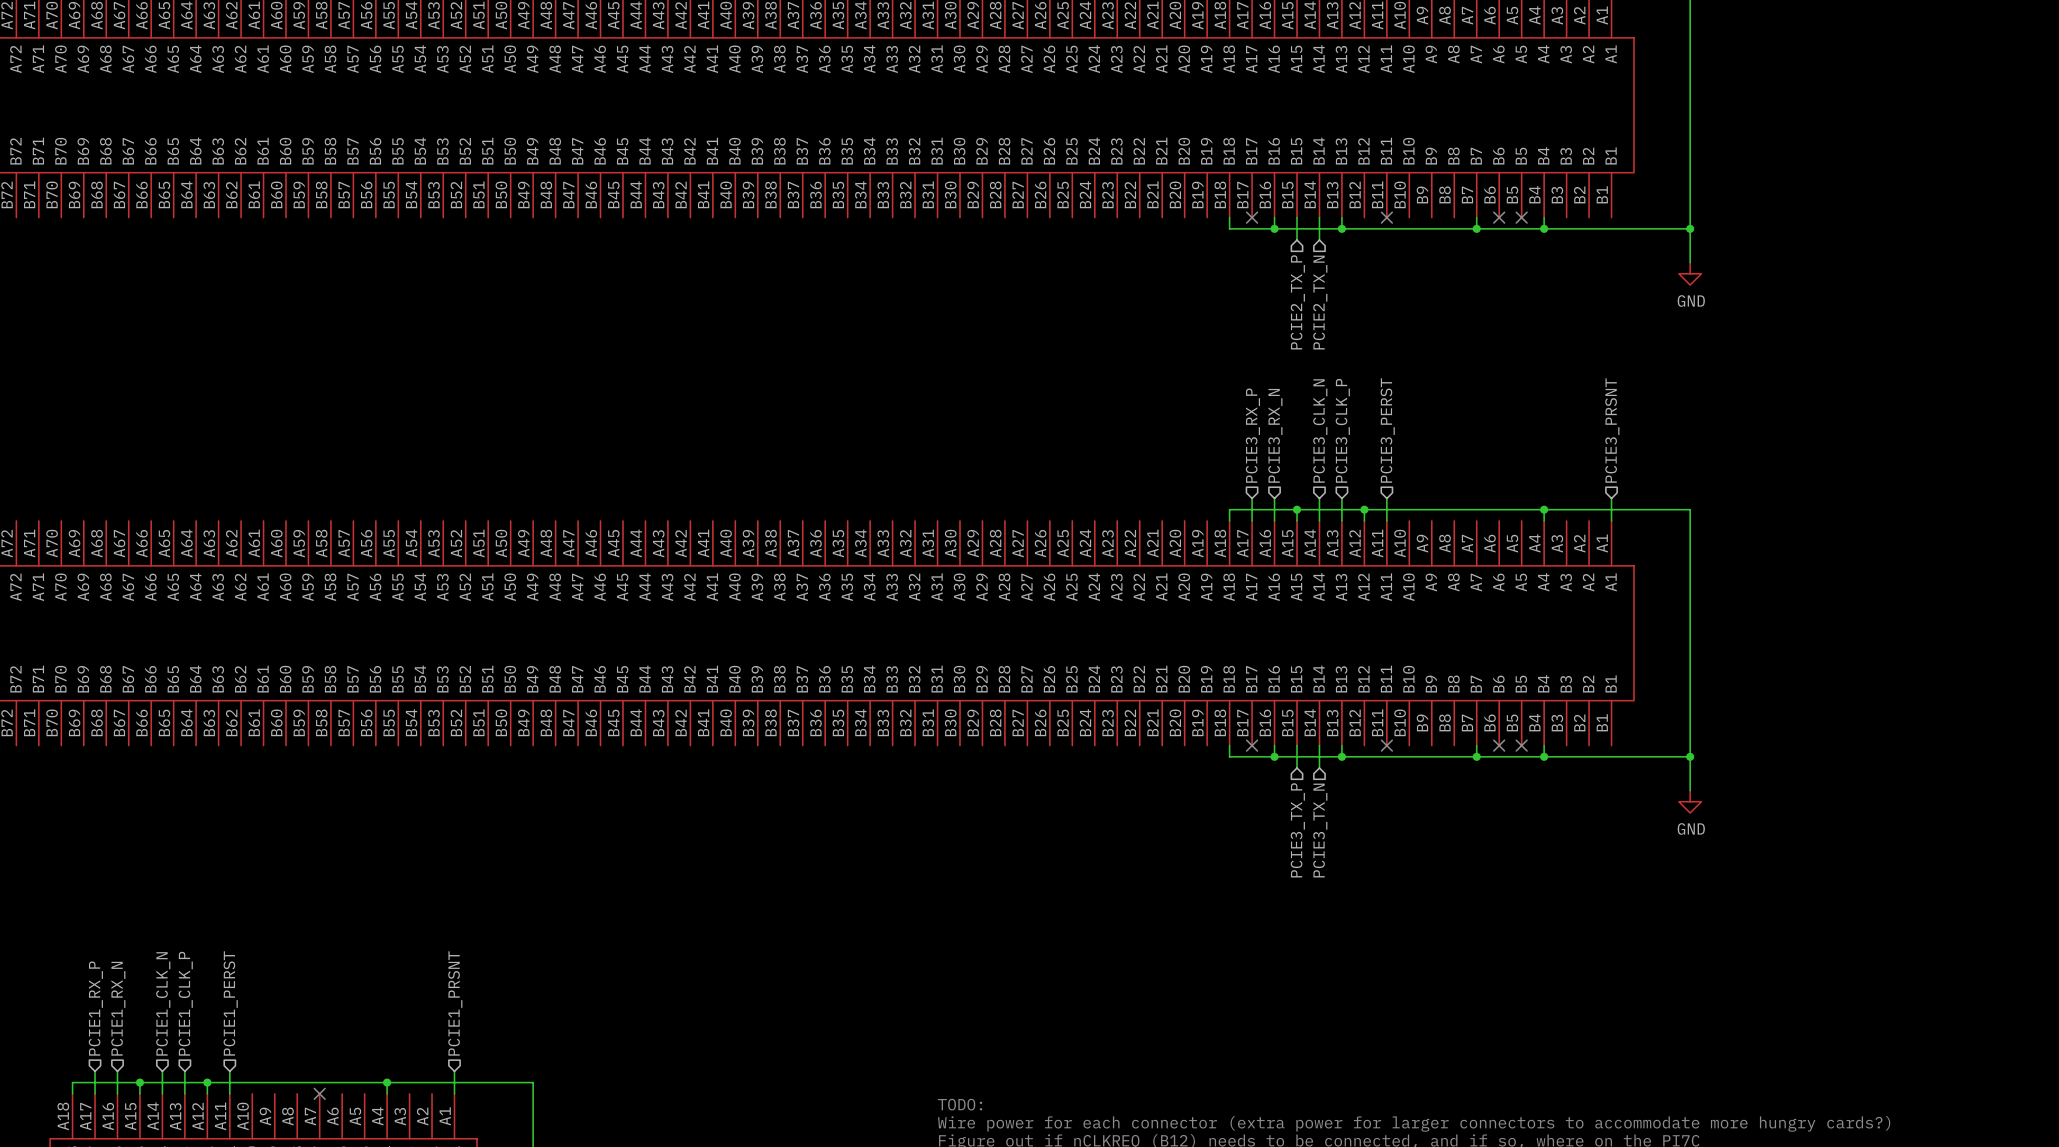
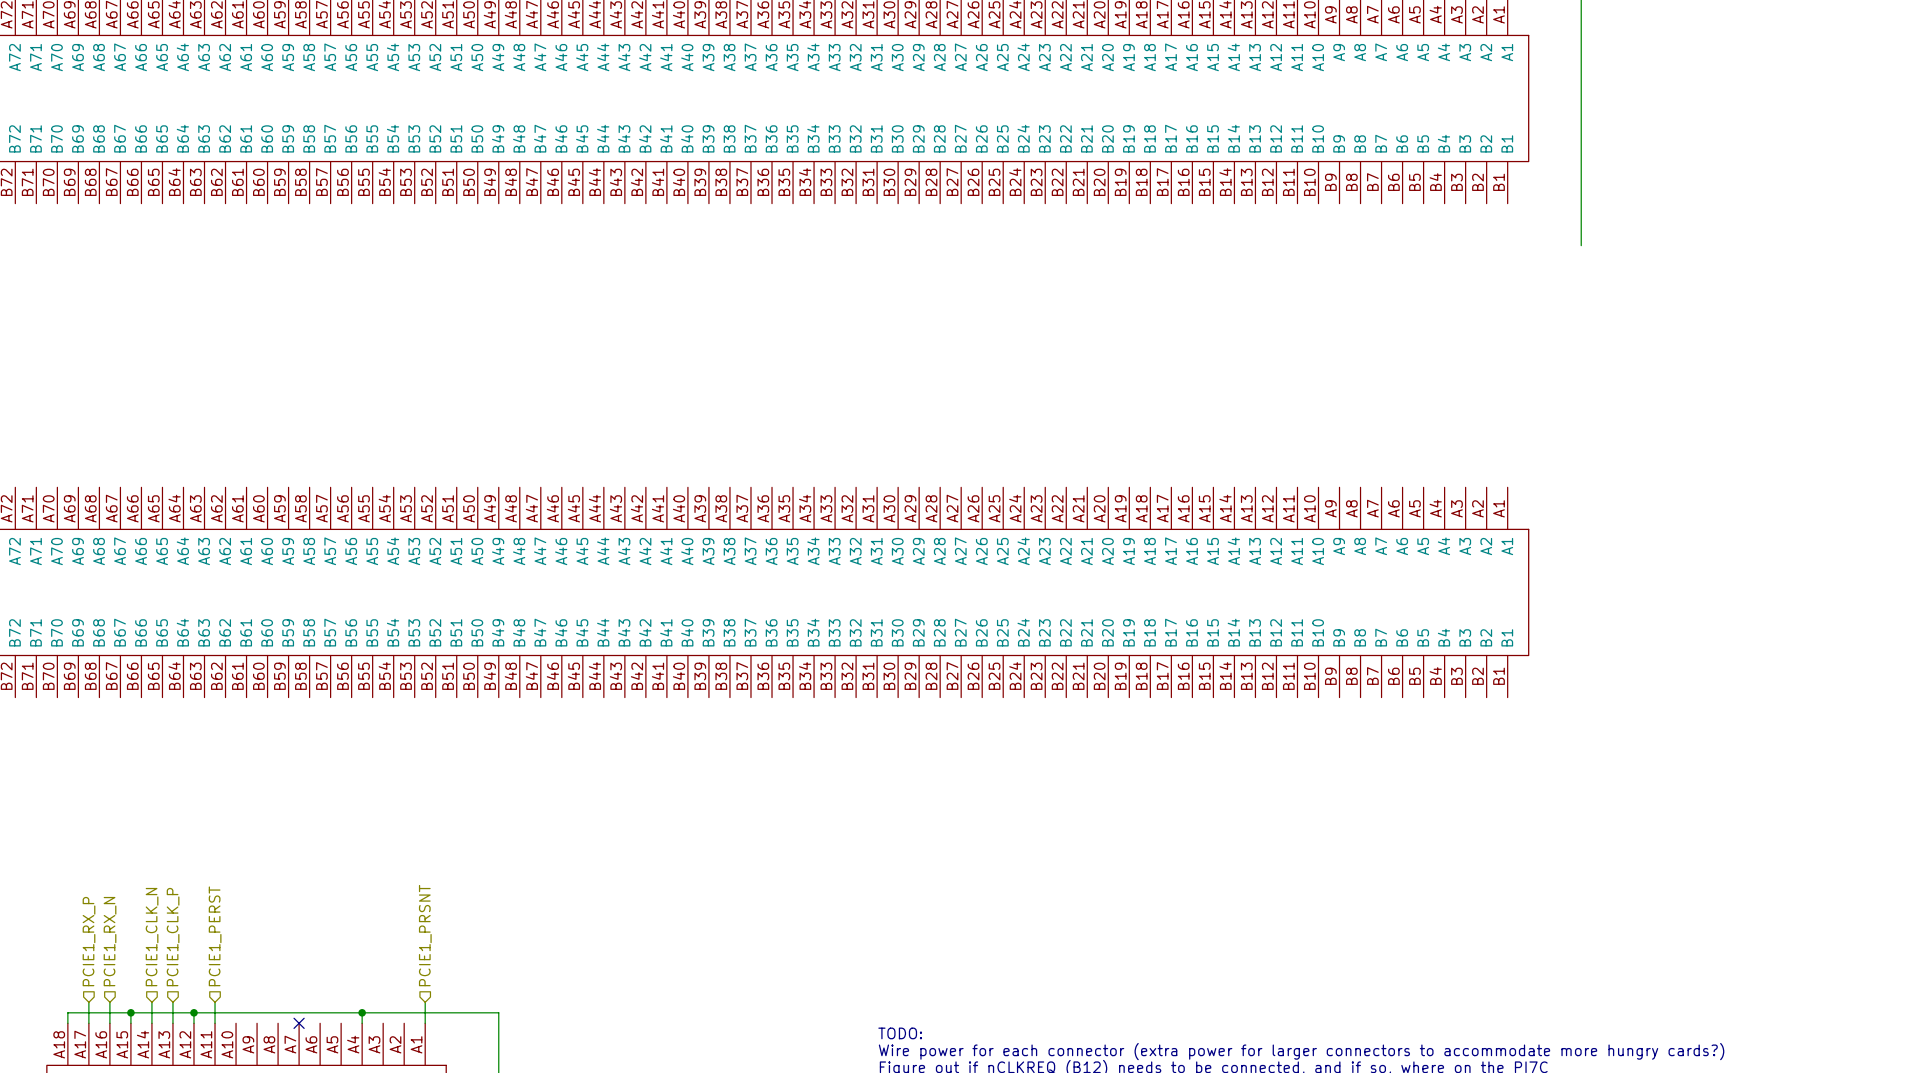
wire: (1229, 217) (1229, 228) (1690, 228) -> none
no-connect mark: (1252, 217) -> none
wire: (1274, 217) (1274, 228) -> none
wire: (1296, 217) (1296, 240) -> none
wire: (1319, 217) (1319, 240) -> none
wire: (1341, 217) (1341, 228) -> none
no-connect mark: (1386, 217) -> none
wire: (1476, 217) (1476, 228) -> none
no-connect mark: (1499, 217) -> none
no-connect mark: (1521, 217) -> none
wire: (1544, 217) (1544, 228) -> none
junction: (1274, 228) -> none
junction: (1341, 228) -> none
junction: (1476, 228) -> none
junction: (1544, 228) -> none
junction: (1690, 228) -> none
power symbol: GND (1690, 273) -> none
hierarchical label: PCIE2_TX_P (1297, 302) -> none
hierarchical label: PCIE2_TX_N (1320, 302) -> none
hierarchical label: PCIE3_CLK_P (1342, 430) -> none
hierarchical label: PCIE3_PERST (1387, 430) -> none
hierarchical label: PCIE3_PRSNT (1612, 430) -> none
hierarchical label: PCIE3_CLK_N (1320, 431) -> none
hierarchical label: PCIE3_RX_P (1252, 435) -> none
hierarchical label: PCIE3_RX_N (1275, 435) -> none
wire: (1252, 498) (1252, 520) -> none
wire: (1274, 498) (1274, 520) -> none
wire: (1319, 498) (1319, 520) -> none
wire: (1341, 498) (1341, 520) -> none
wire: (1386, 498) (1386, 520) -> none
wire: (1611, 498) (1611, 520) -> none
wire: (1296, 509) (1296, 520) -> none
junction: (1296, 509) -> none
wire: (1364, 509) (1364, 520) -> none
junction: (1364, 509) -> none
wire: (1544, 509) (1544, 520) -> none
junction: (1544, 509) -> none
wire: (1229, 520) (1229, 509) (1690, 509) (1690, 790) -> none
wire: (1229, 745) (1229, 756) (1690, 756) -> none
no-connect mark: (1252, 745) -> none
wire: (1274, 745) (1274, 756) -> none
wire: (1296, 745) (1296, 768) -> none
wire: (1319, 745) (1319, 768) -> none
wire: (1341, 745) (1341, 756) -> none
no-connect mark: (1386, 745) -> none
wire: (1476, 745) (1476, 756) -> none
no-connect mark: (1499, 745) -> none
no-connect mark: (1521, 745) -> none
wire: (1544, 745) (1544, 756) -> none
junction: (1274, 756) -> none
junction: (1341, 756) -> none
junction: (1476, 756) -> none
junction: (1544, 756) -> none
junction: (1690, 756) -> none
power symbol: GND (1690, 801) -> none
hierarchical label: PCIE3_TX_P (1297, 830) -> none
hierarchical label: PCIE3_TX_N (1320, 830) -> none

